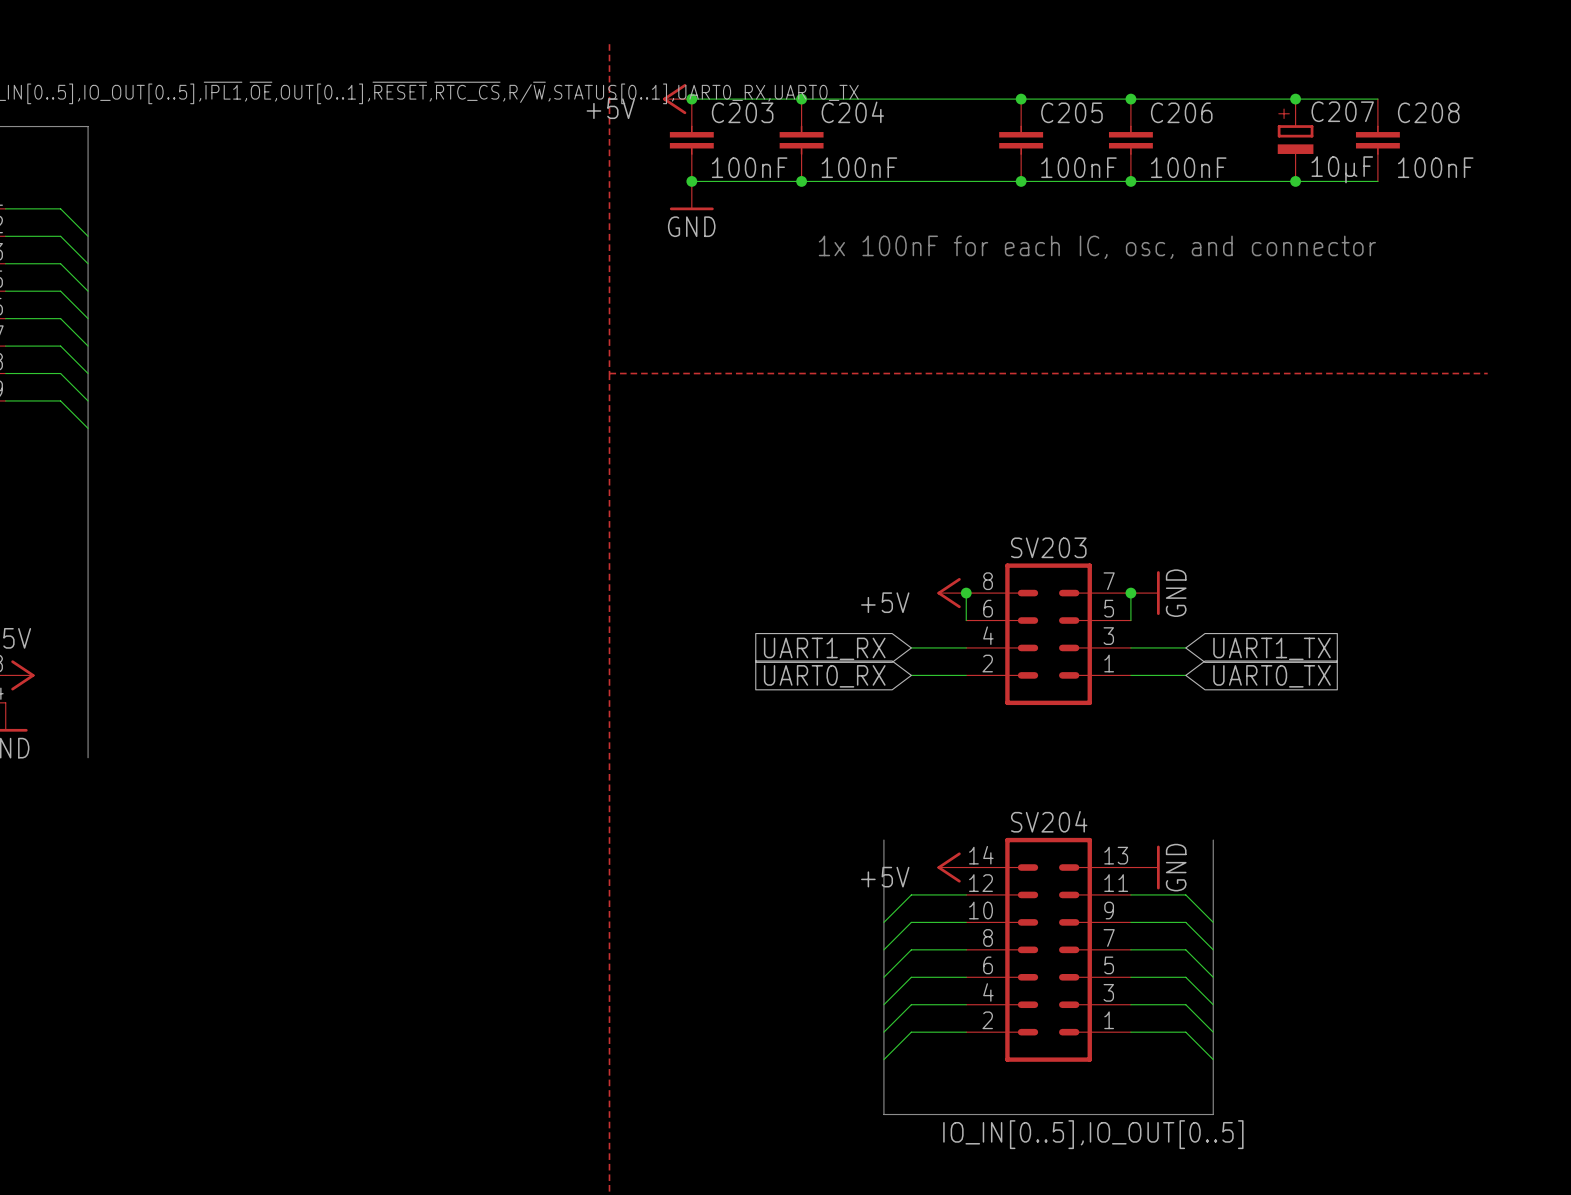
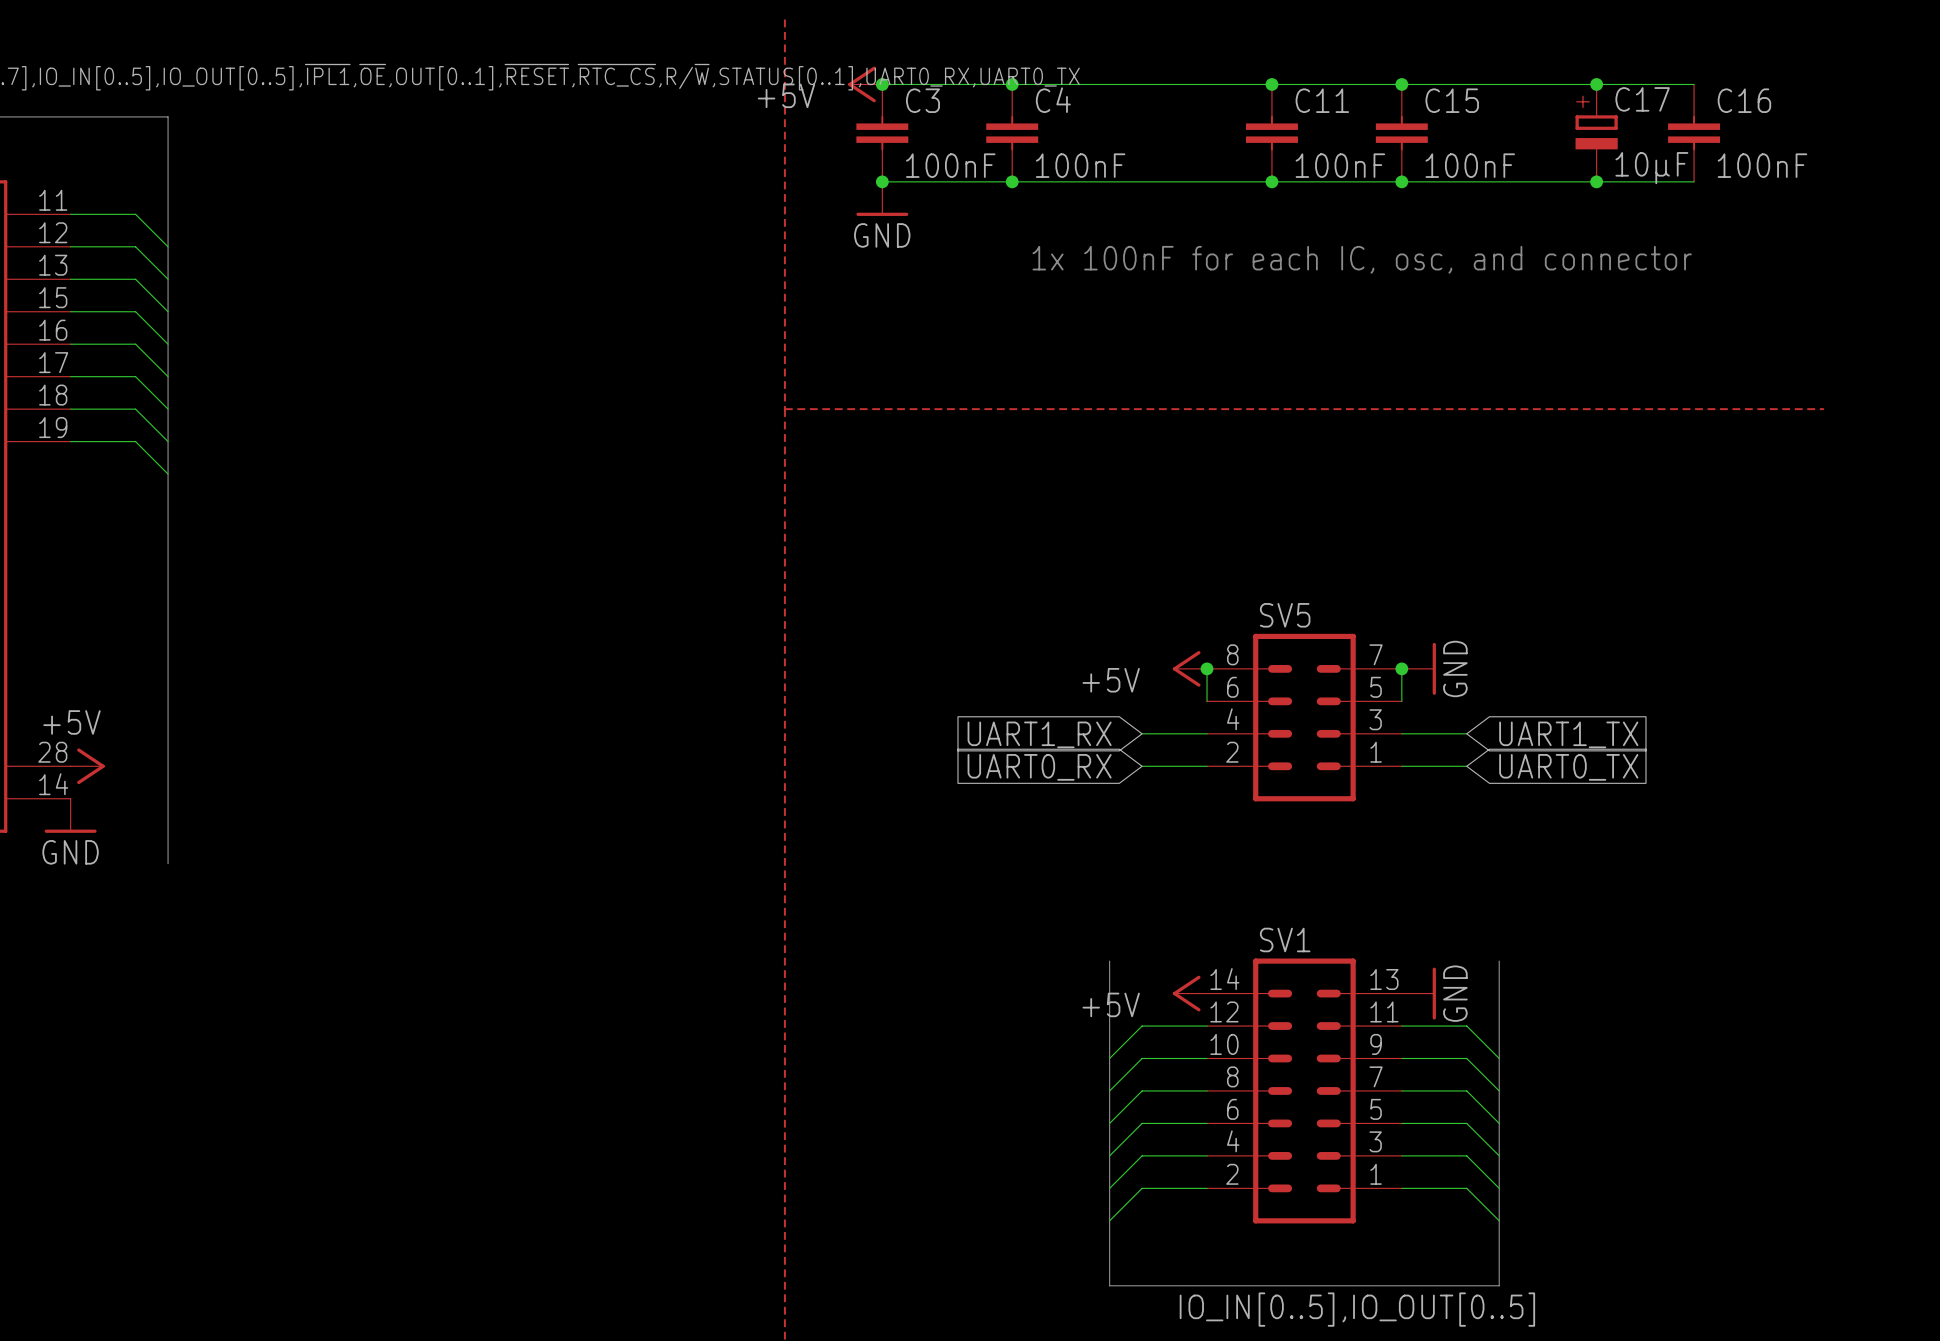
C207 name: C207 (1342, 111) -> C17 (1642, 99)
C203 name: C203 (742, 112) -> C3 (922, 100)
C204 name: C204 (852, 112) -> C4 (1053, 100)
C205 name: C205 (1071, 112) -> C11 (1322, 100)
C206 name: C206 (1181, 112) -> C15 (1452, 100)
C208 name: C208 (1428, 112) -> C16 (1744, 100)
SV203 name: SV203 (1048, 547) -> SV5 (1285, 615)
SV204 name: SV204 (1049, 821) -> SV1 (1285, 939)

